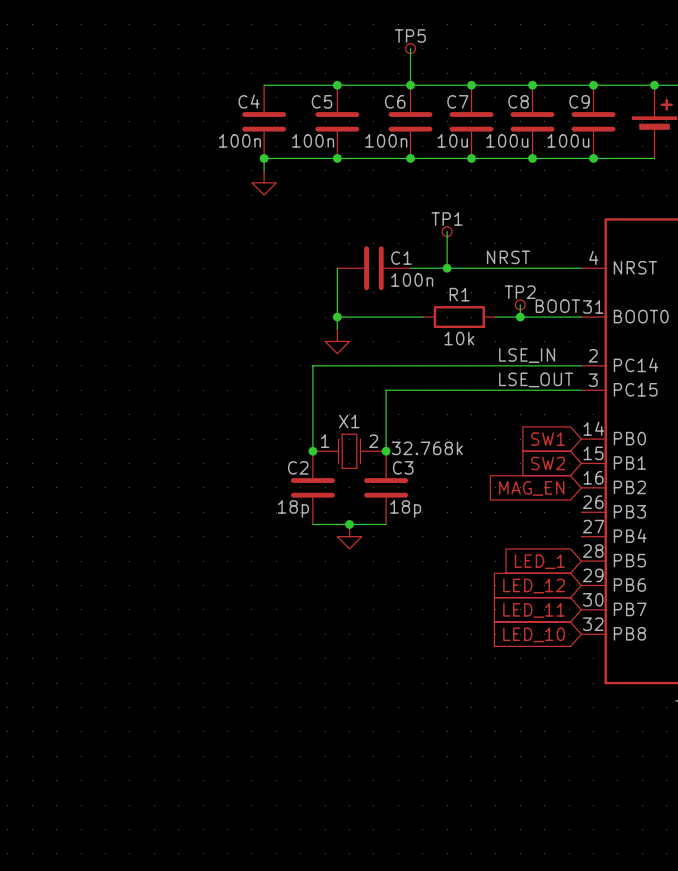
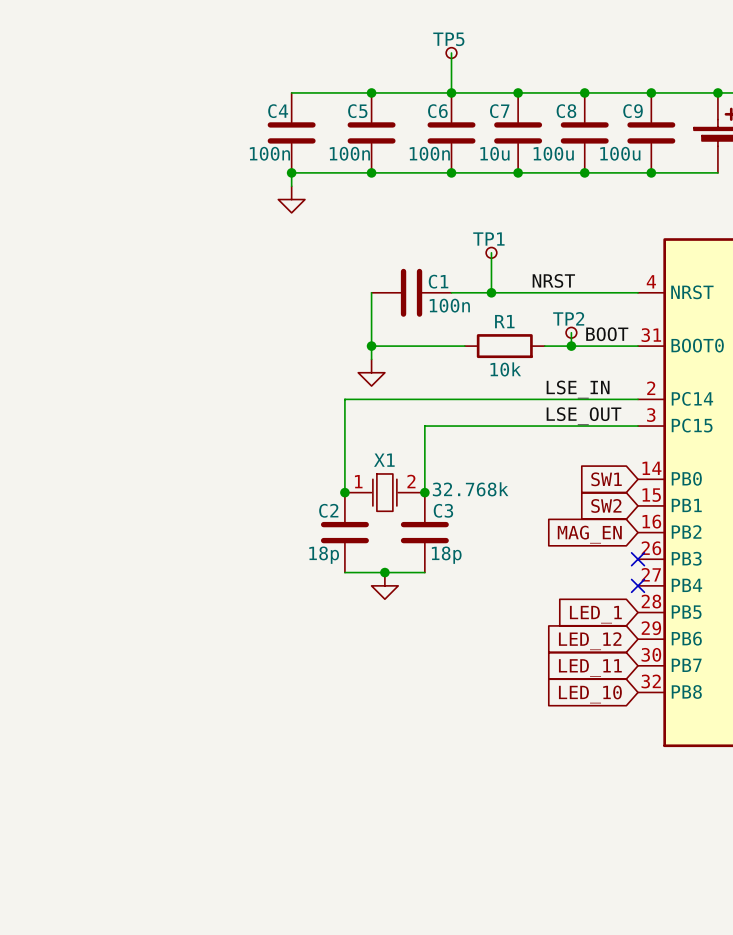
no-connect mark: none -> (638, 559)
no-connect mark: none -> (638, 585)

